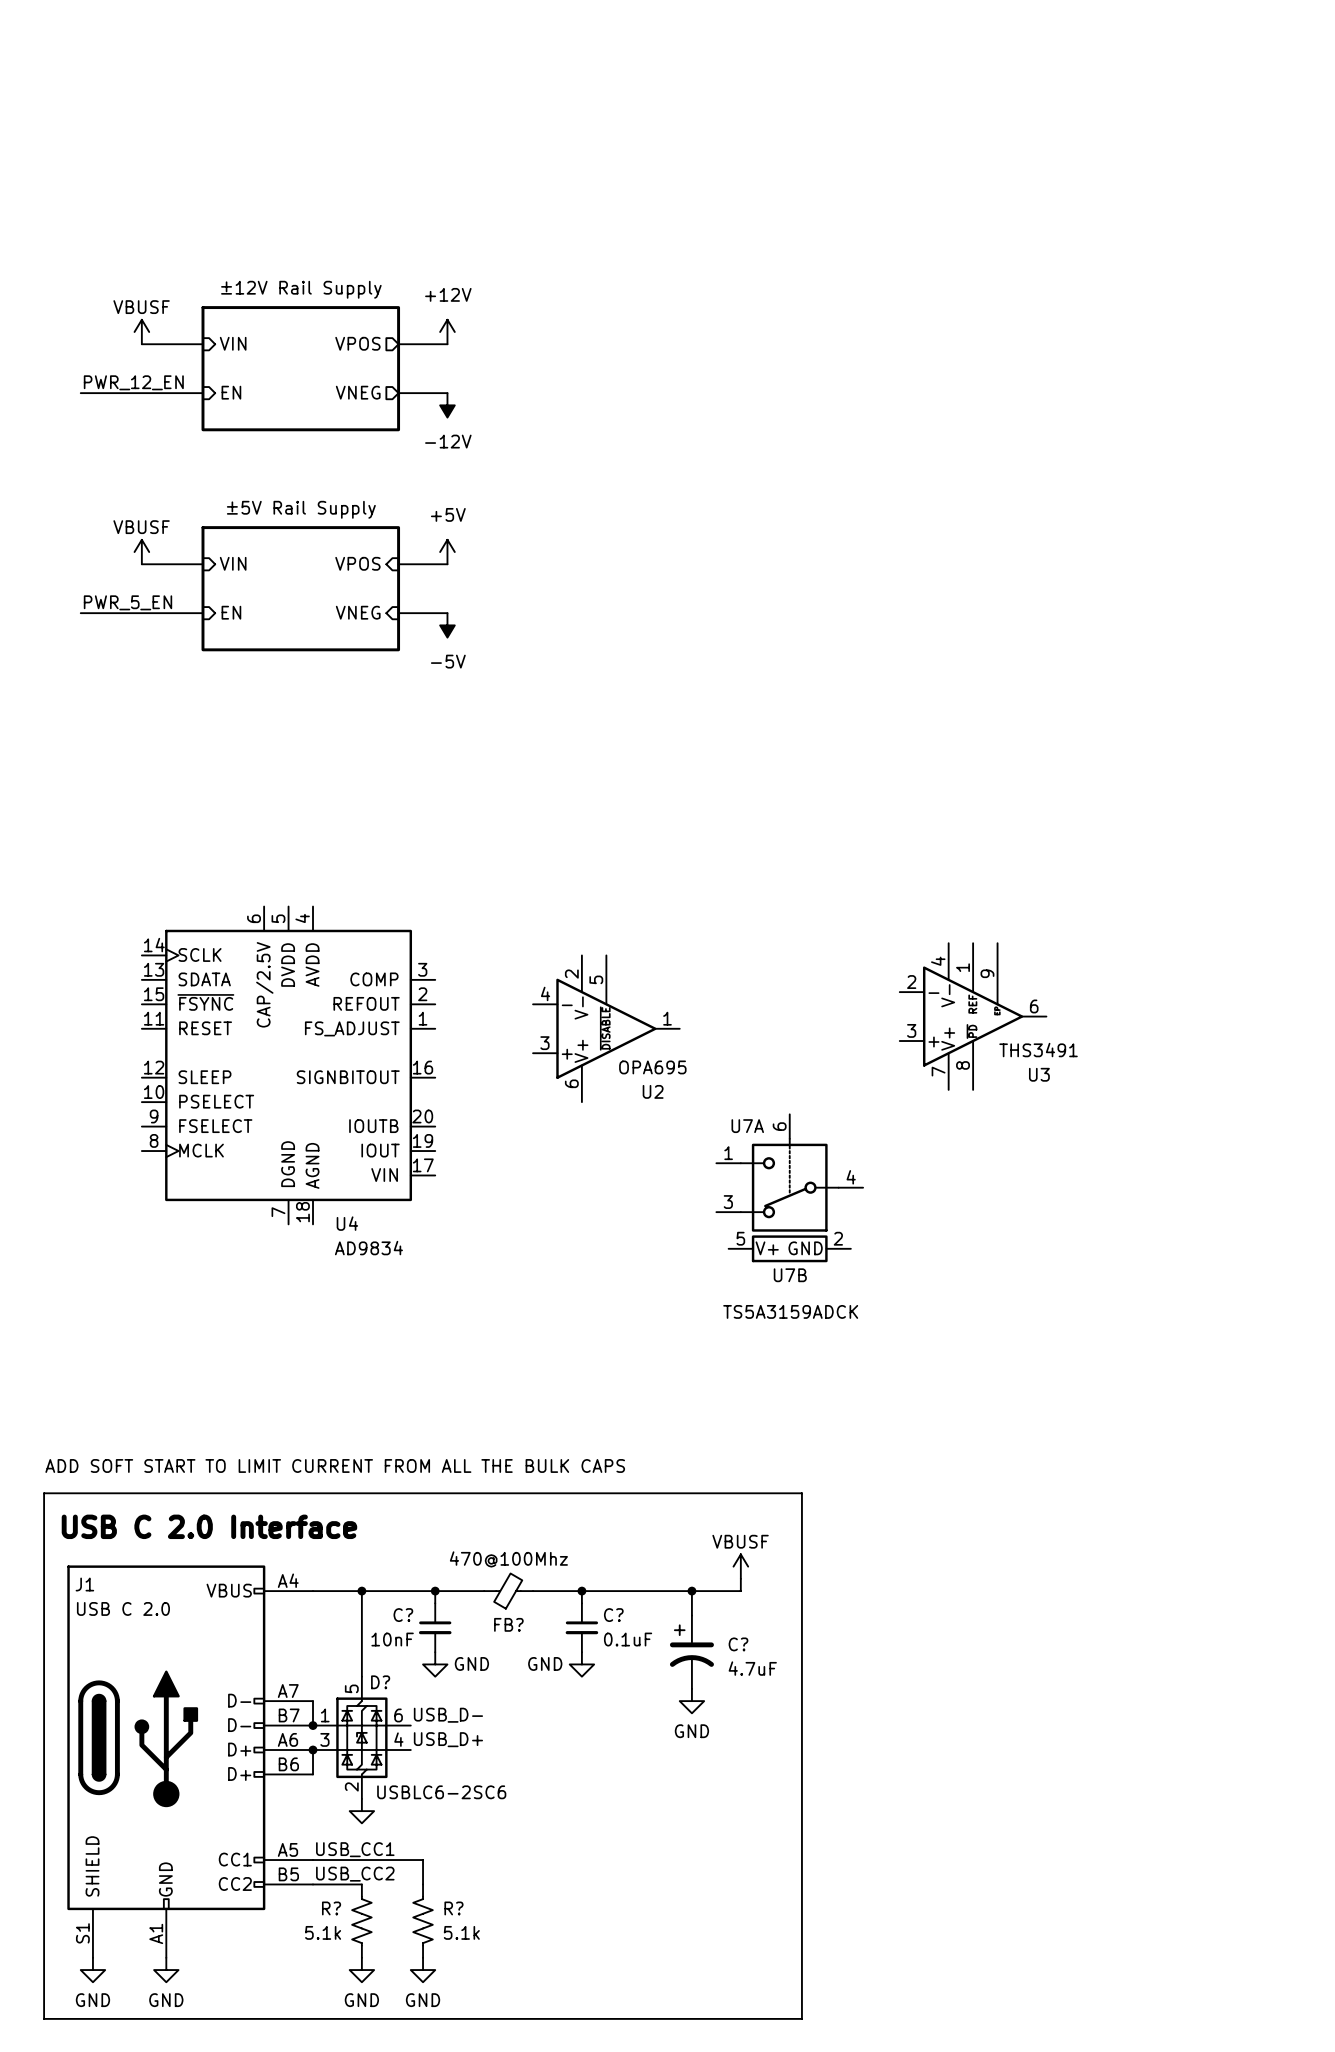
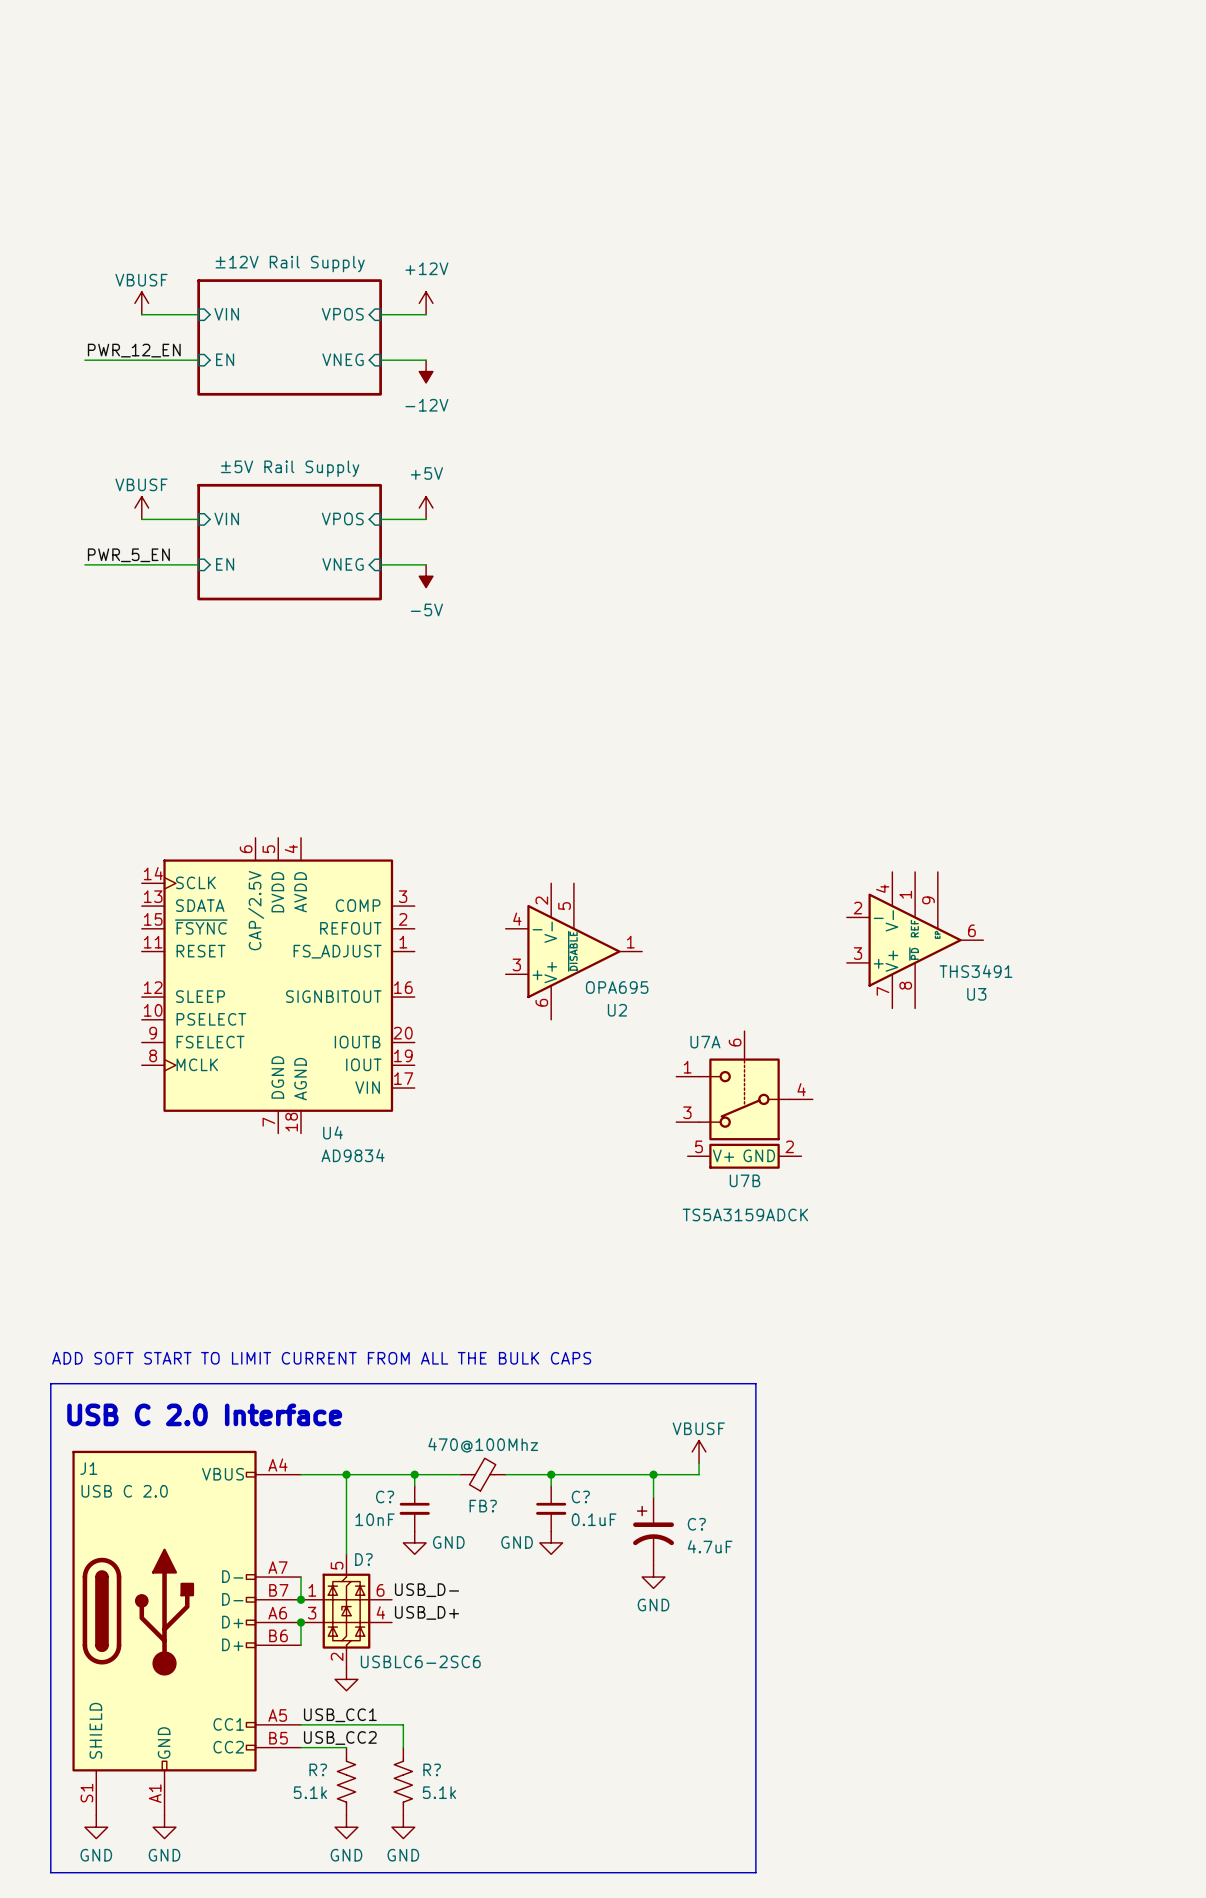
sheet pin shape: output (357, 343) -> input (342, 314)
sheet pin shape: output (358, 392) -> input (343, 359)

